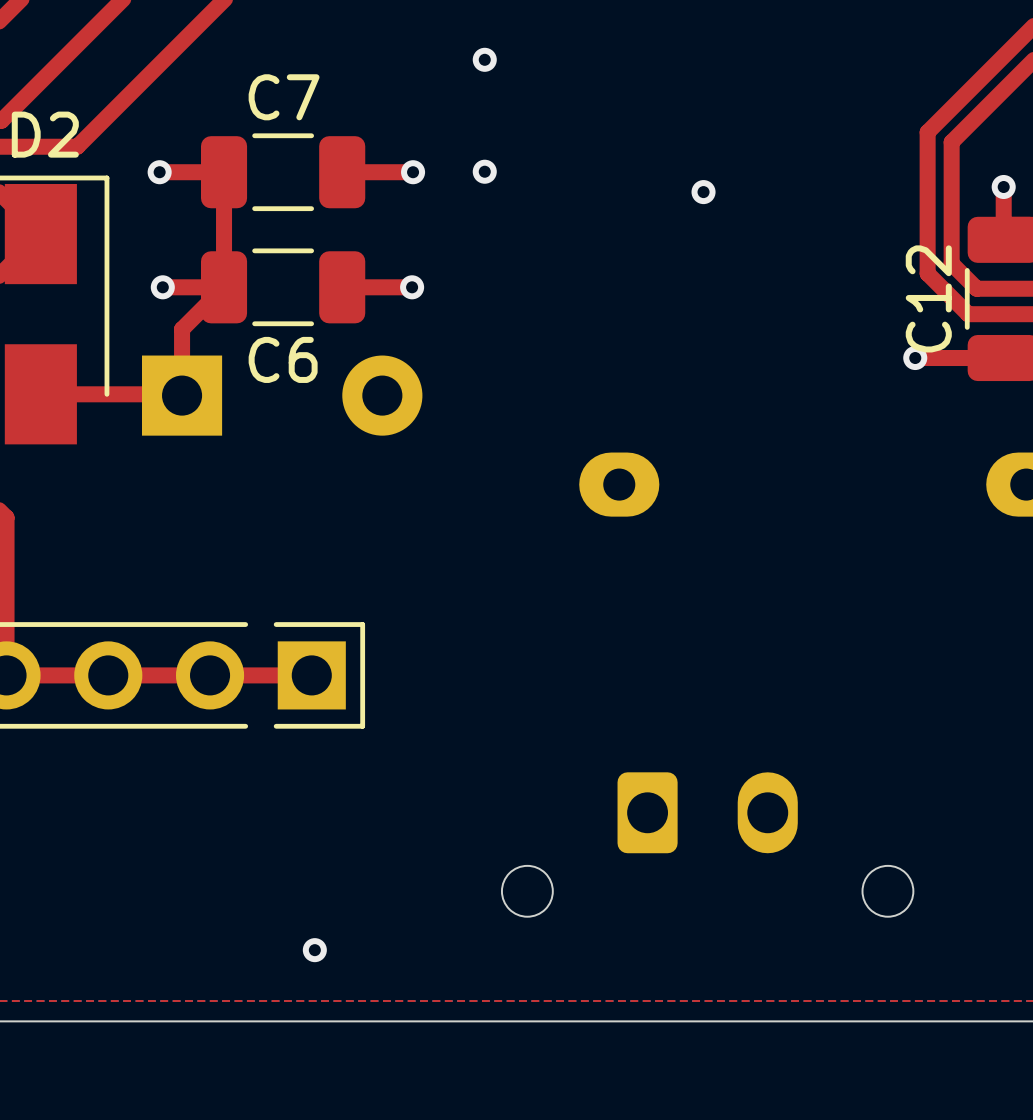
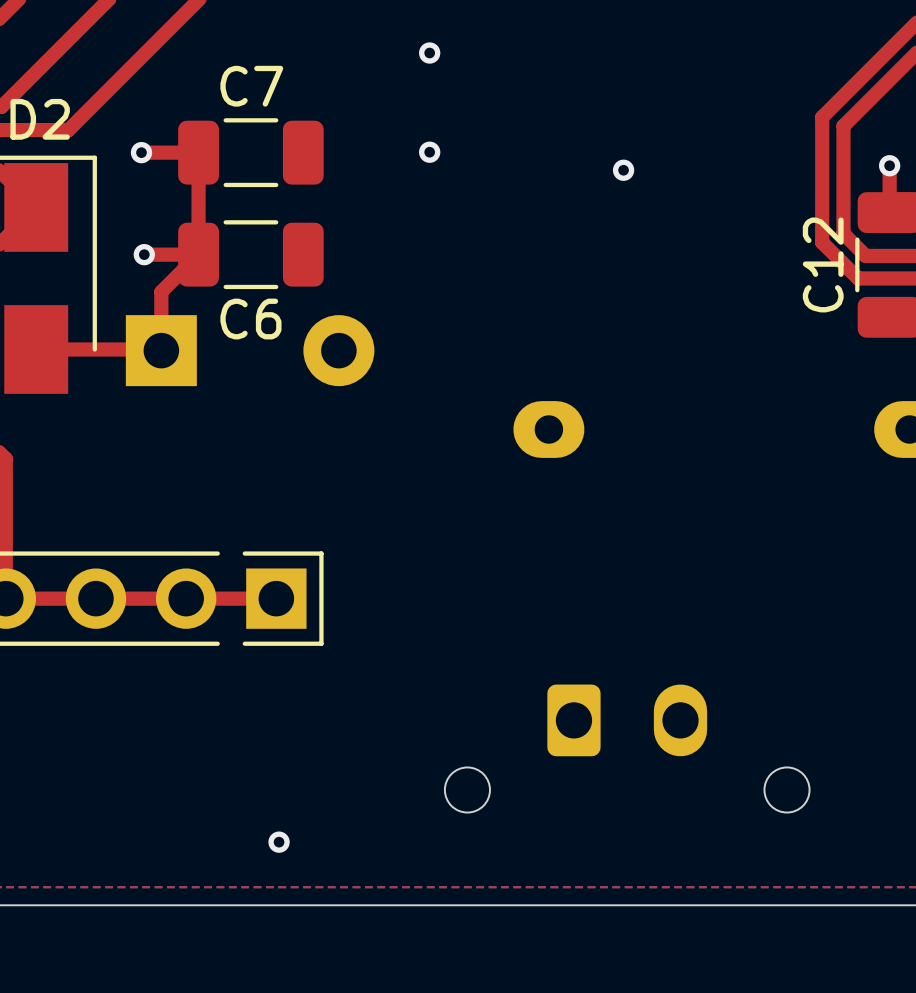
top track: (342, 172) (413, 172) -> none
via: (413, 172) -> none
top track: (342, 287) (412, 287) -> none
via: (412, 287) -> none
top track: (915, 358) (1003, 358) -> none
via: (915, 358) -> none

